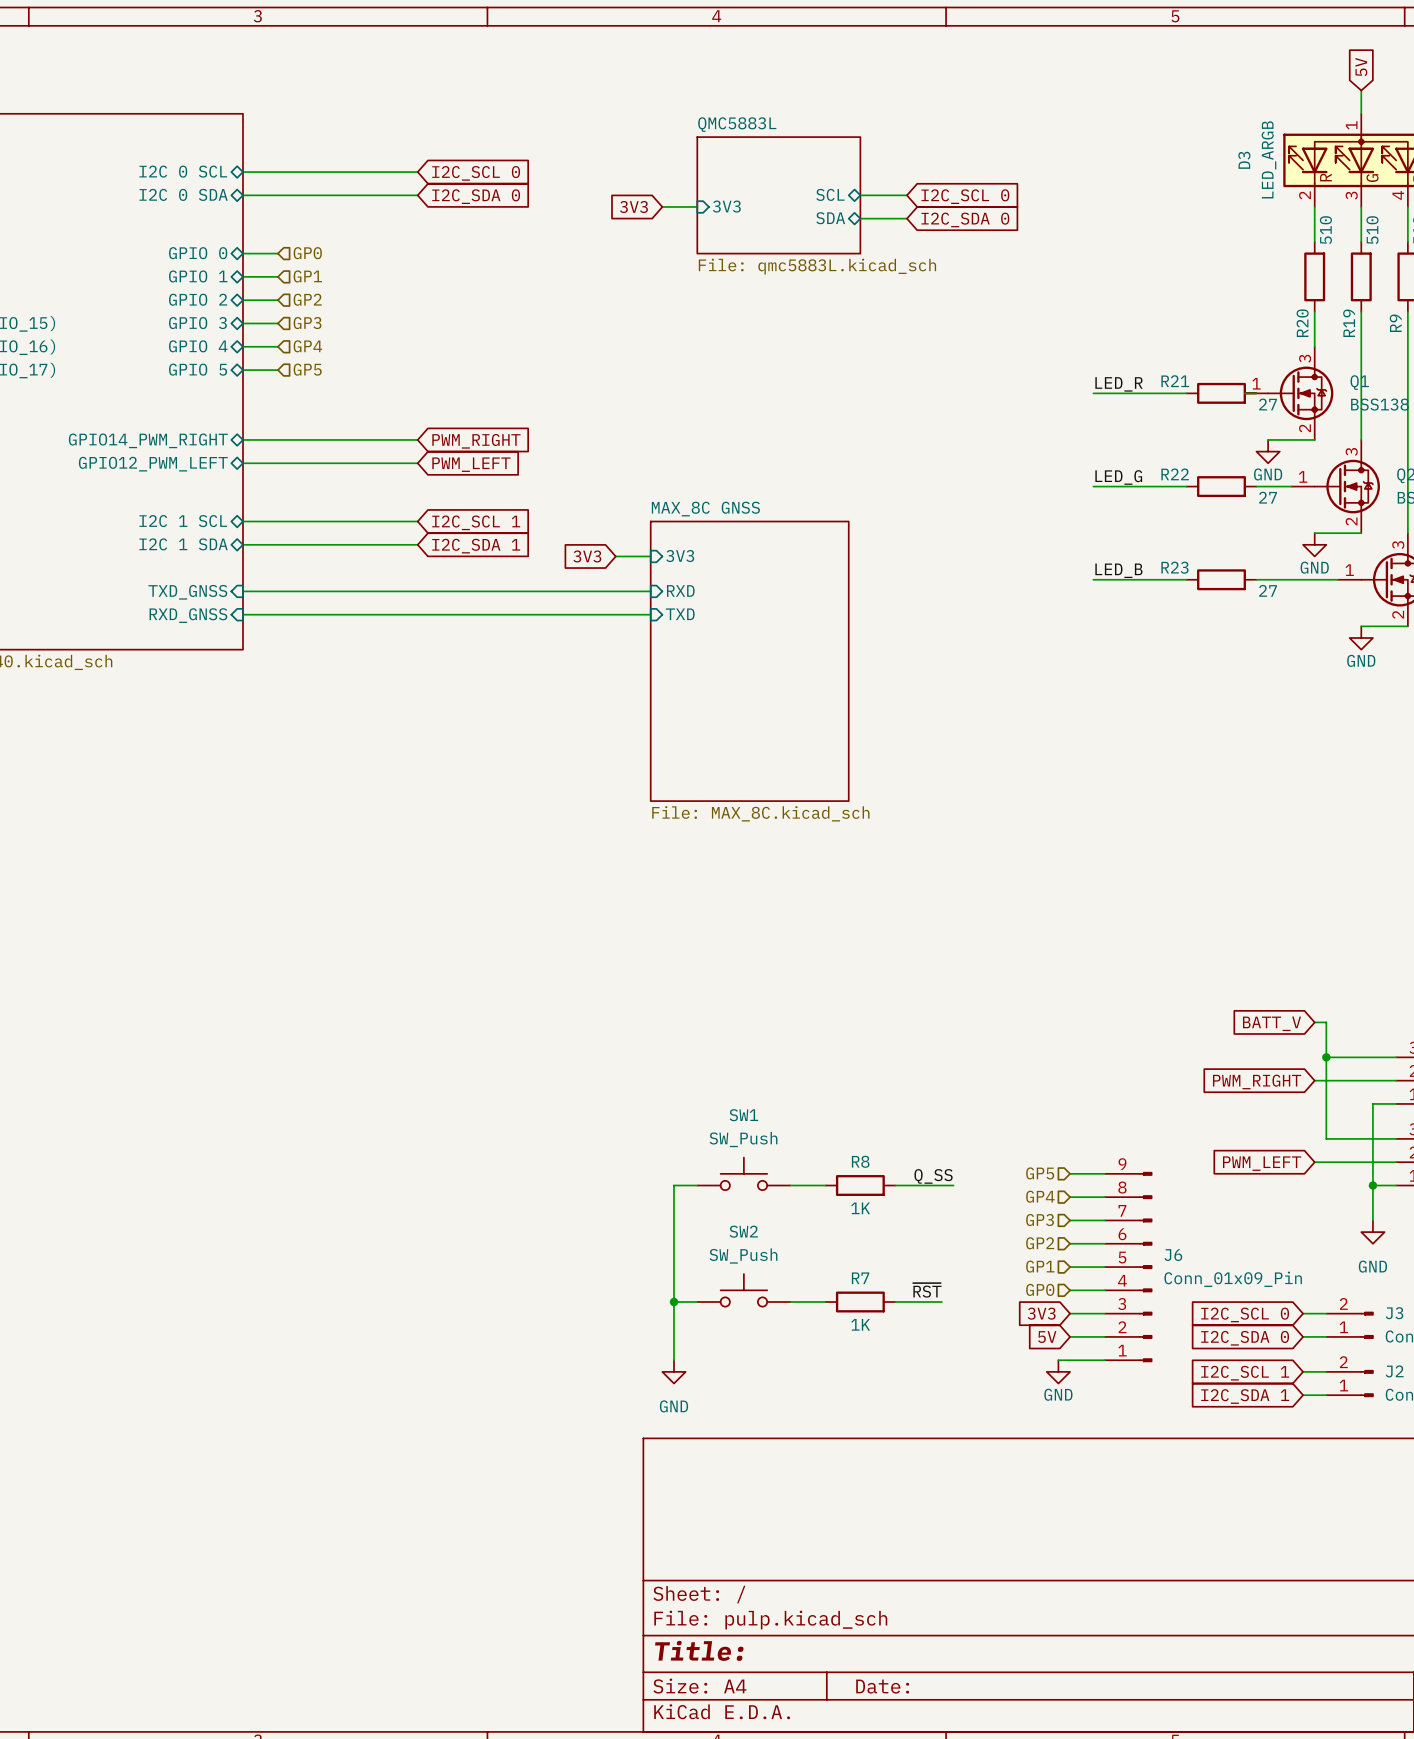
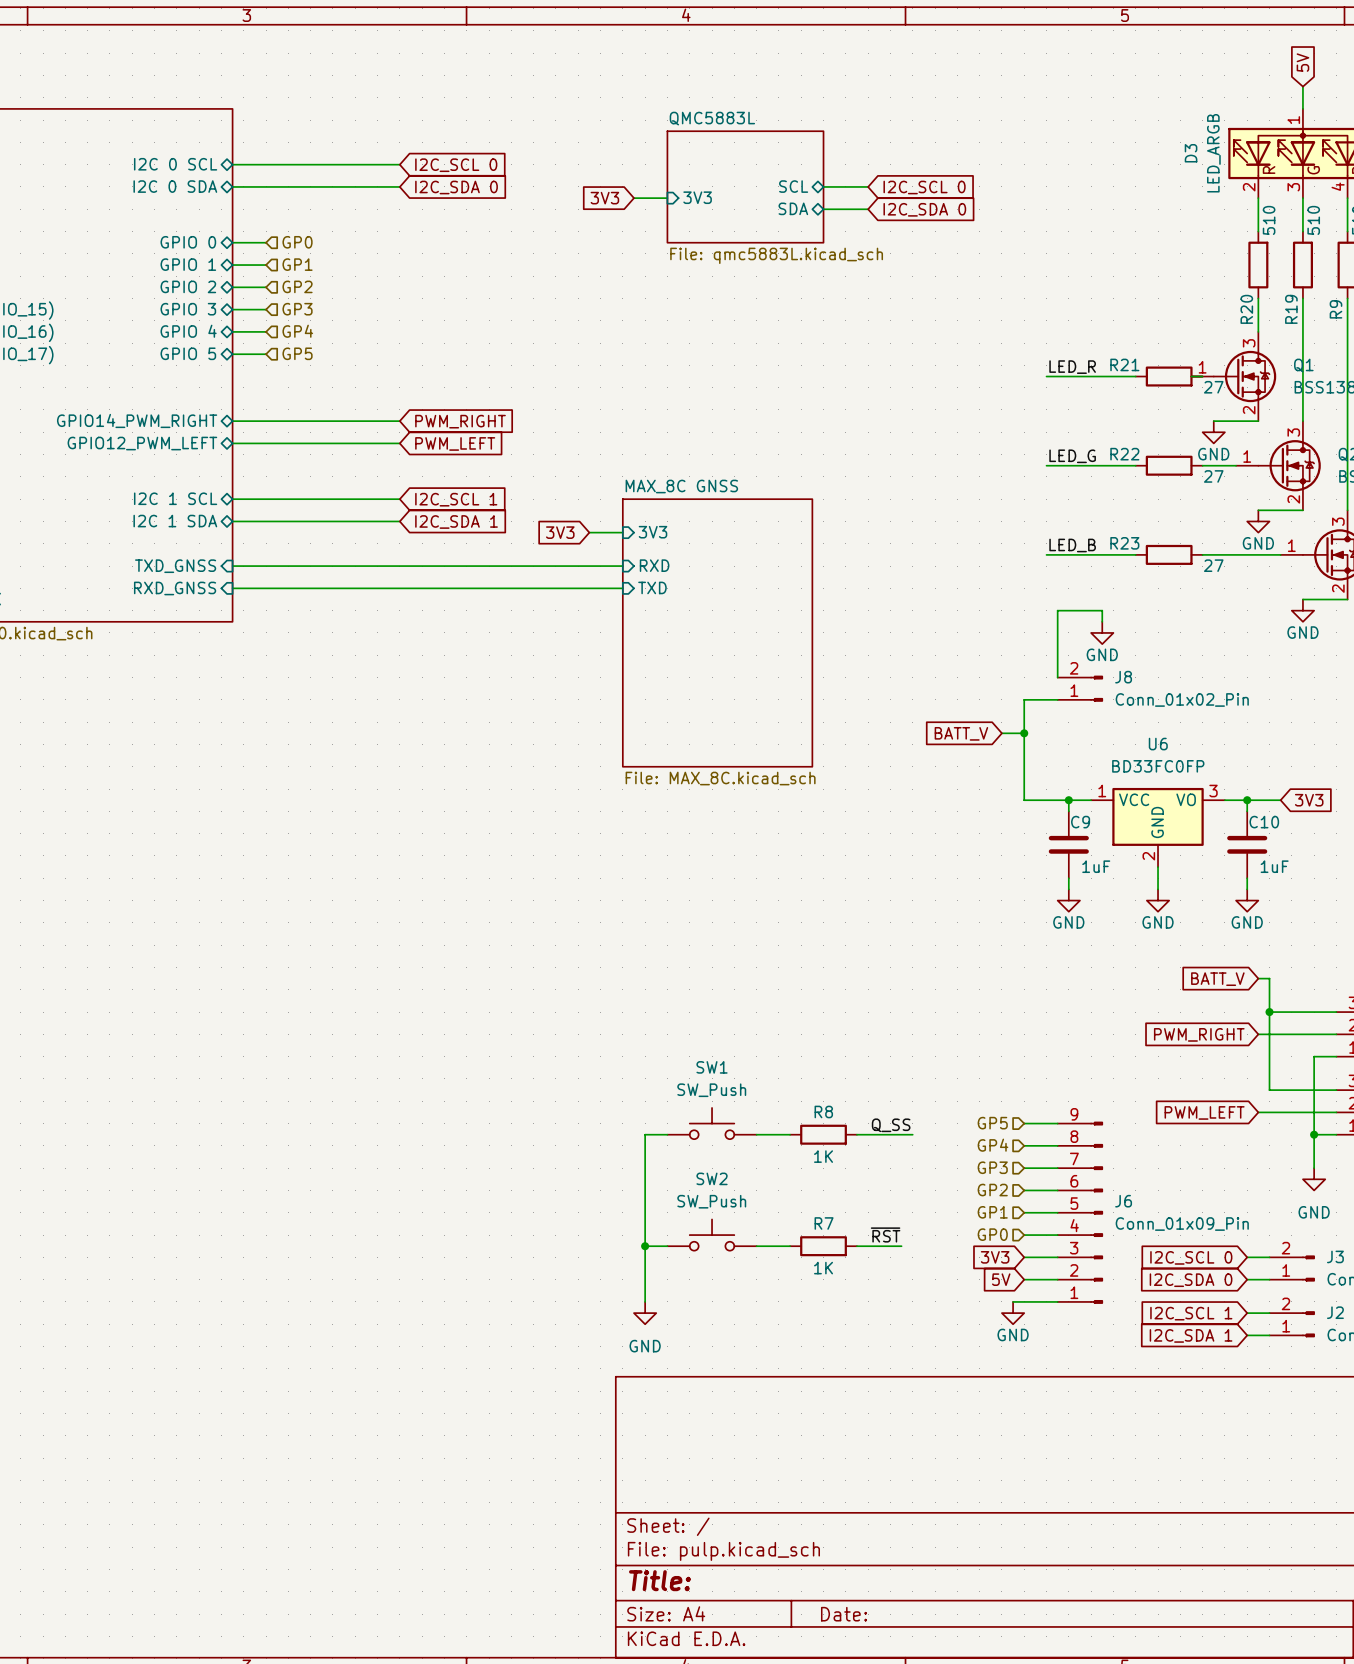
wire: none -> (1102, 621) (1102, 610) (1057, 610) (1057, 677)
power symbol: none -> GND (1102, 632)
J8: none -> Conn_01x02_Pin (1080, 688)
wire: none -> (1057, 699) (1024, 699) (1024, 800) (1091, 800)
wire: none -> (1001, 733) (1024, 733)
junction: none -> (1024, 733)
global label: none -> BATT_V (961, 733)
wire: none -> (1068, 800) (1068, 811)
junction: none -> (1068, 800)
wire: none -> (1224, 800) (1280, 800)
wire: none -> (1247, 800) (1247, 811)
junction: none -> (1247, 800)
global label: none -> 3V3 (1309, 800)
U6: none -> BD33FC0FP (1158, 827)
C9: none -> 1uF (1068, 844)
C10: none -> 1uF (1247, 844)
wire: none -> (1158, 867) (1158, 889)
wire: none -> (1068, 878) (1068, 889)
wire: none -> (1247, 878) (1247, 889)
power symbol: none -> GND (1068, 900)
power symbol: none -> GND (1158, 900)
power symbol: none -> GND (1247, 900)

